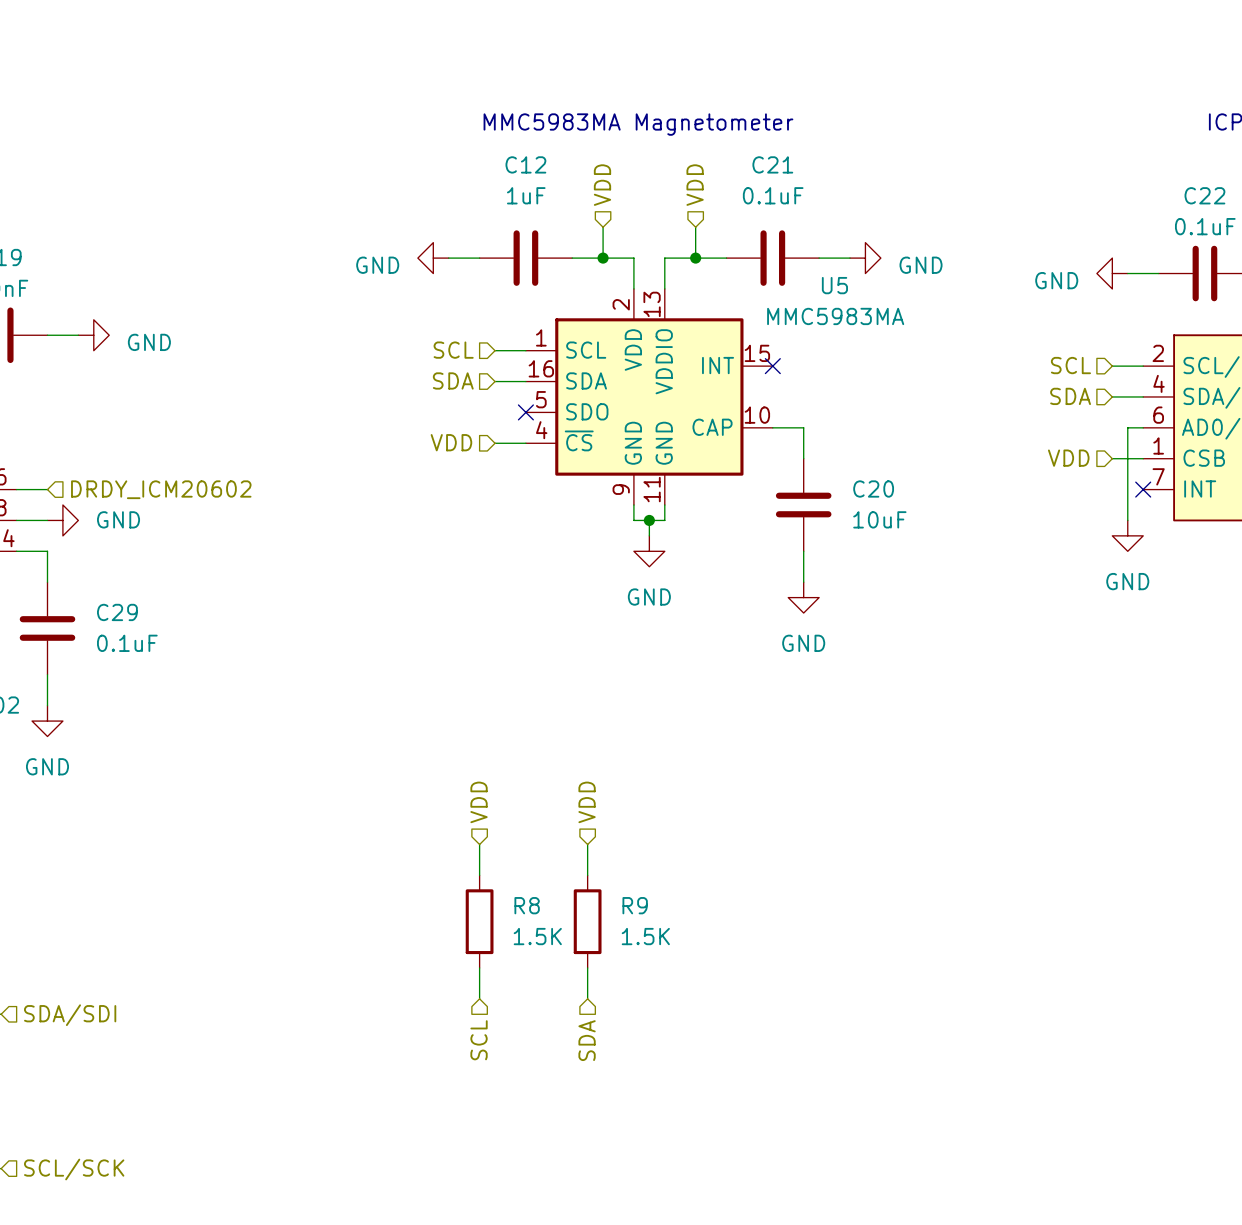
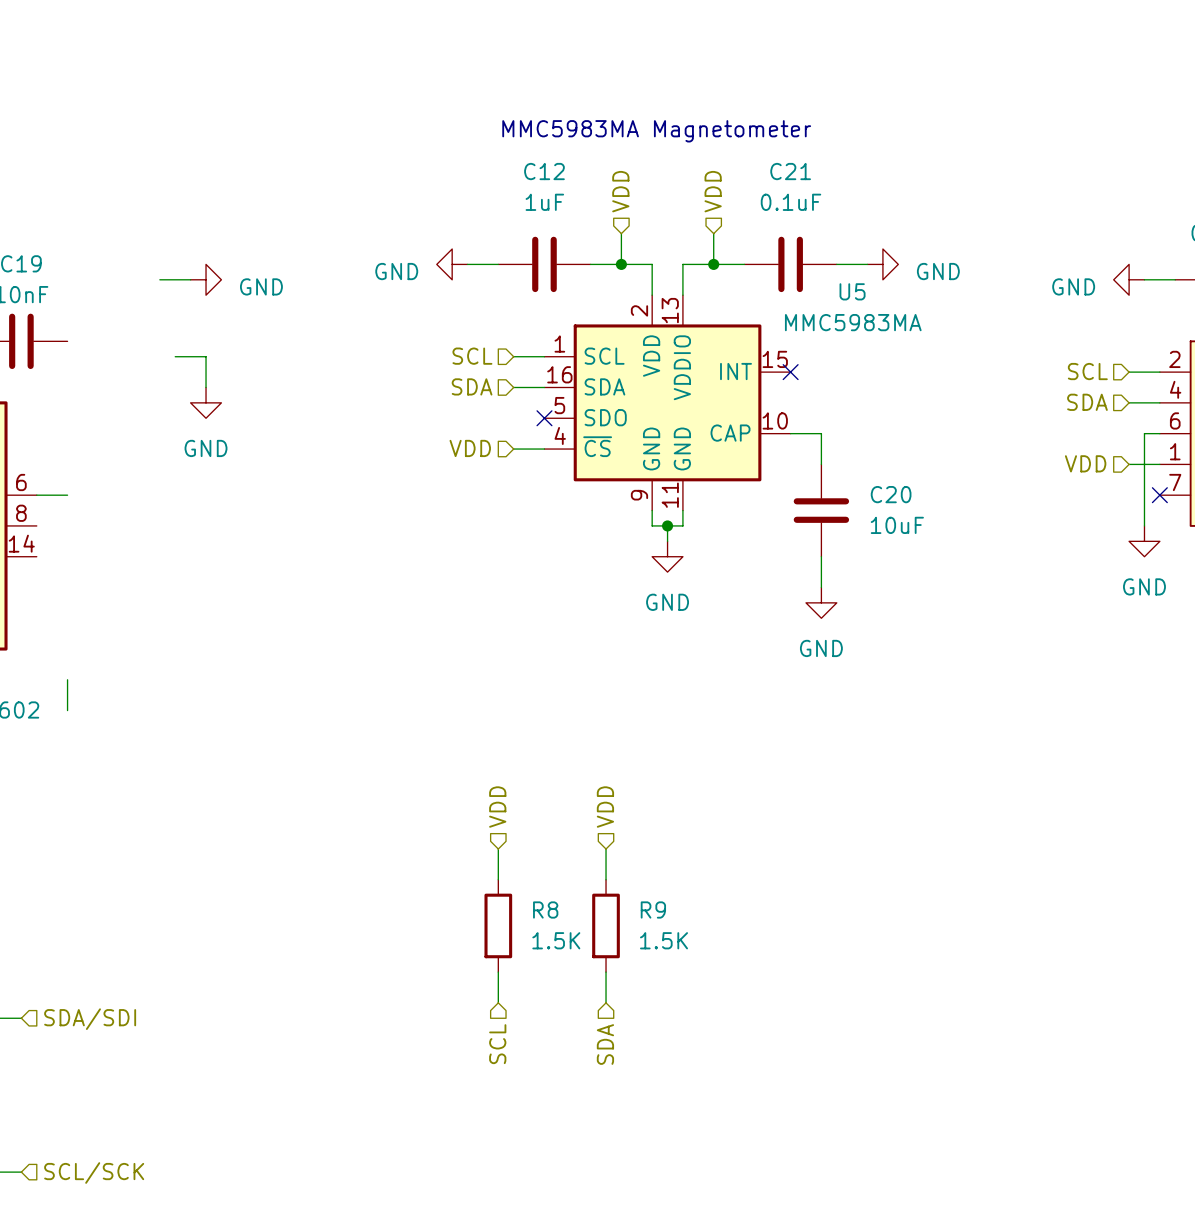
power symbol: none -> GND (206, 279)
wire: (47, 335) (78, 335) -> (159, 279) (190, 279)
power symbol: GND (93, 335) -> none
power symbol: none -> GND (206, 402)
hierarchical label: DRDY_ICM20602 (161, 489) -> none
wire: (16, 520) (47, 520) -> none
power symbol: GND (62, 520) -> none
wire: (16, 551) (47, 551) (47, 582) -> (175, 356) (206, 356) (206, 387)
C29: 0.1uF (47, 628) -> none
power symbol: GND (47, 721) -> none

